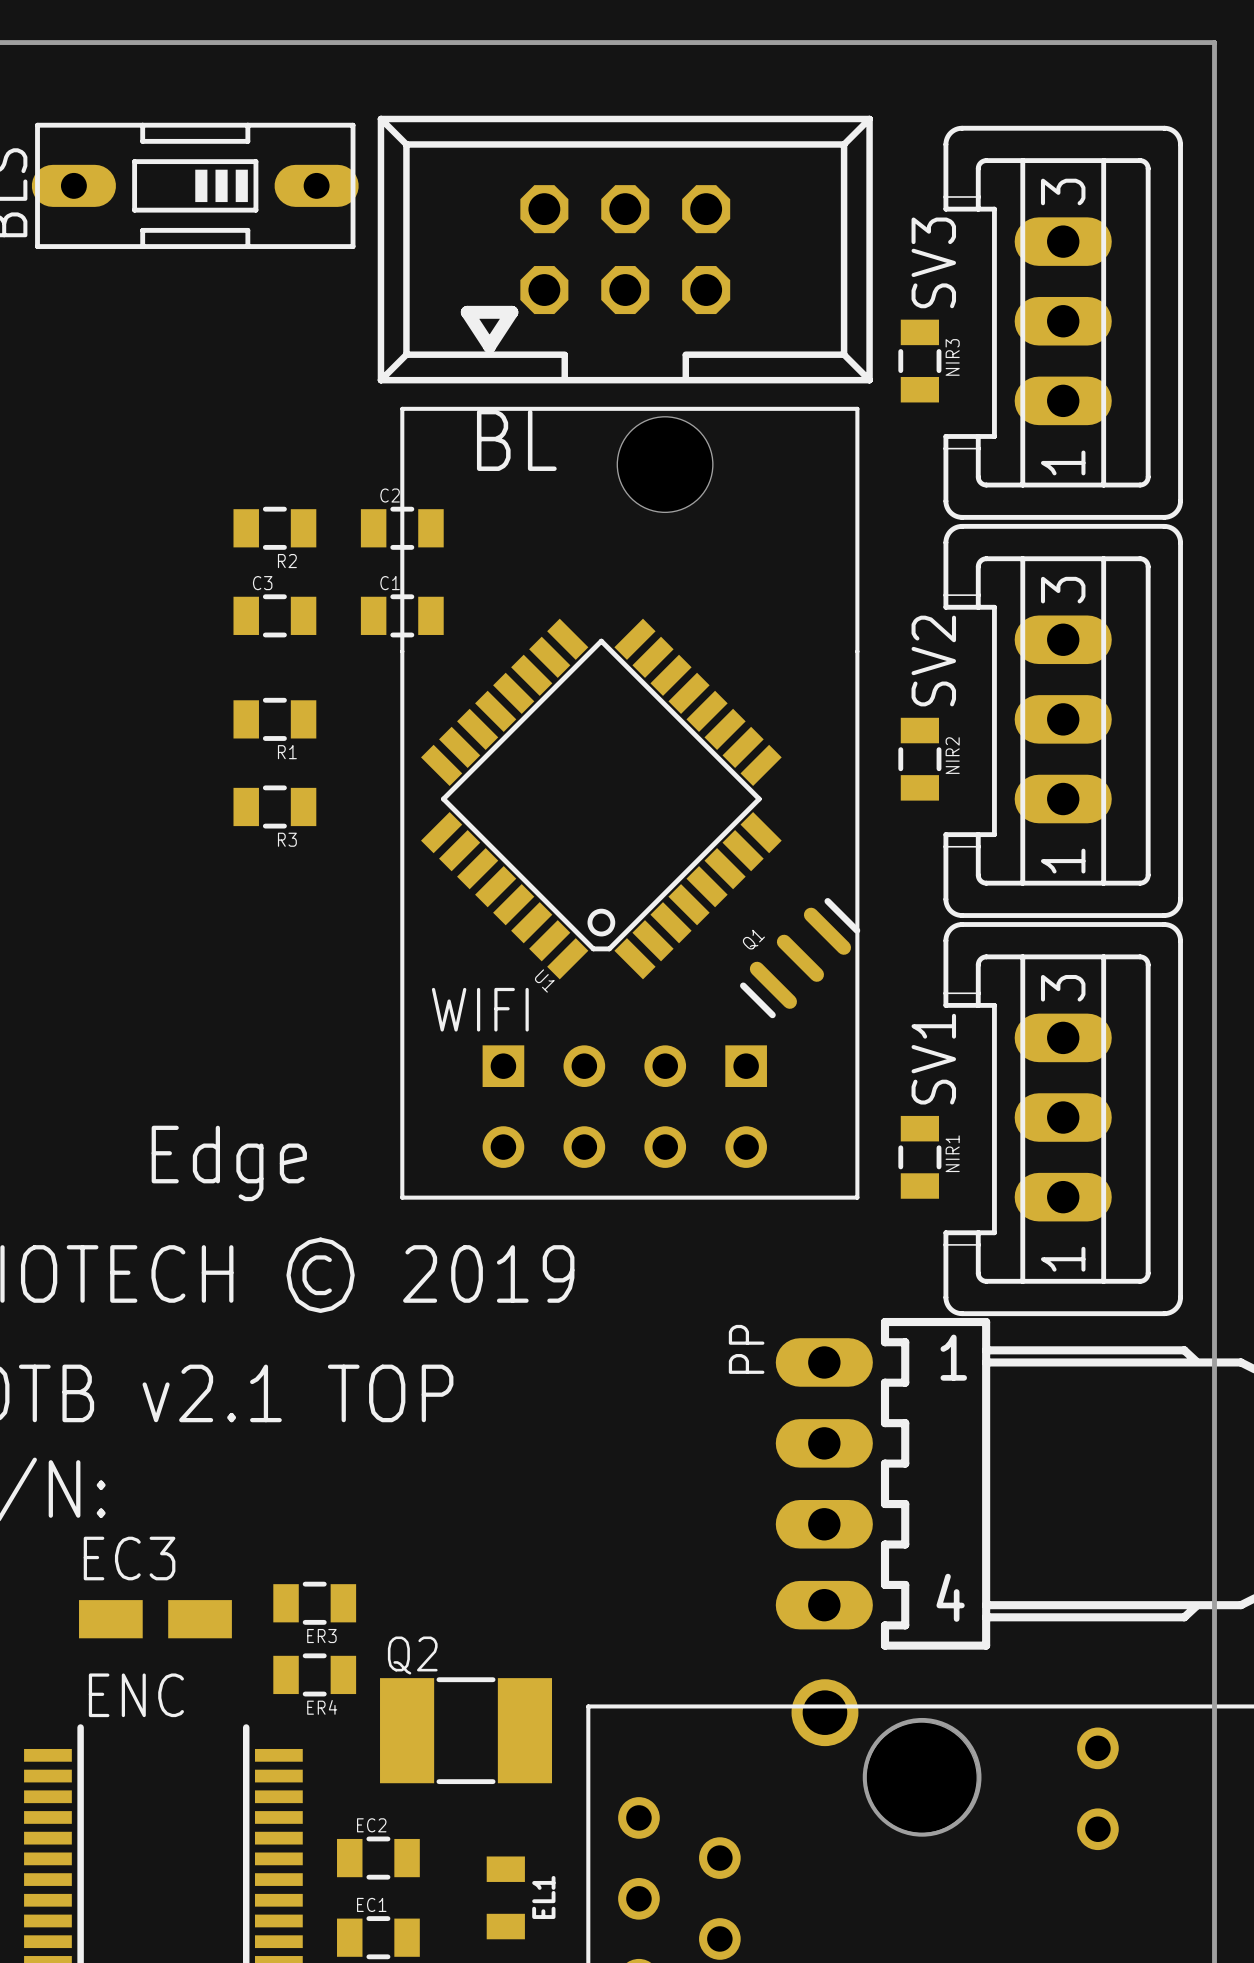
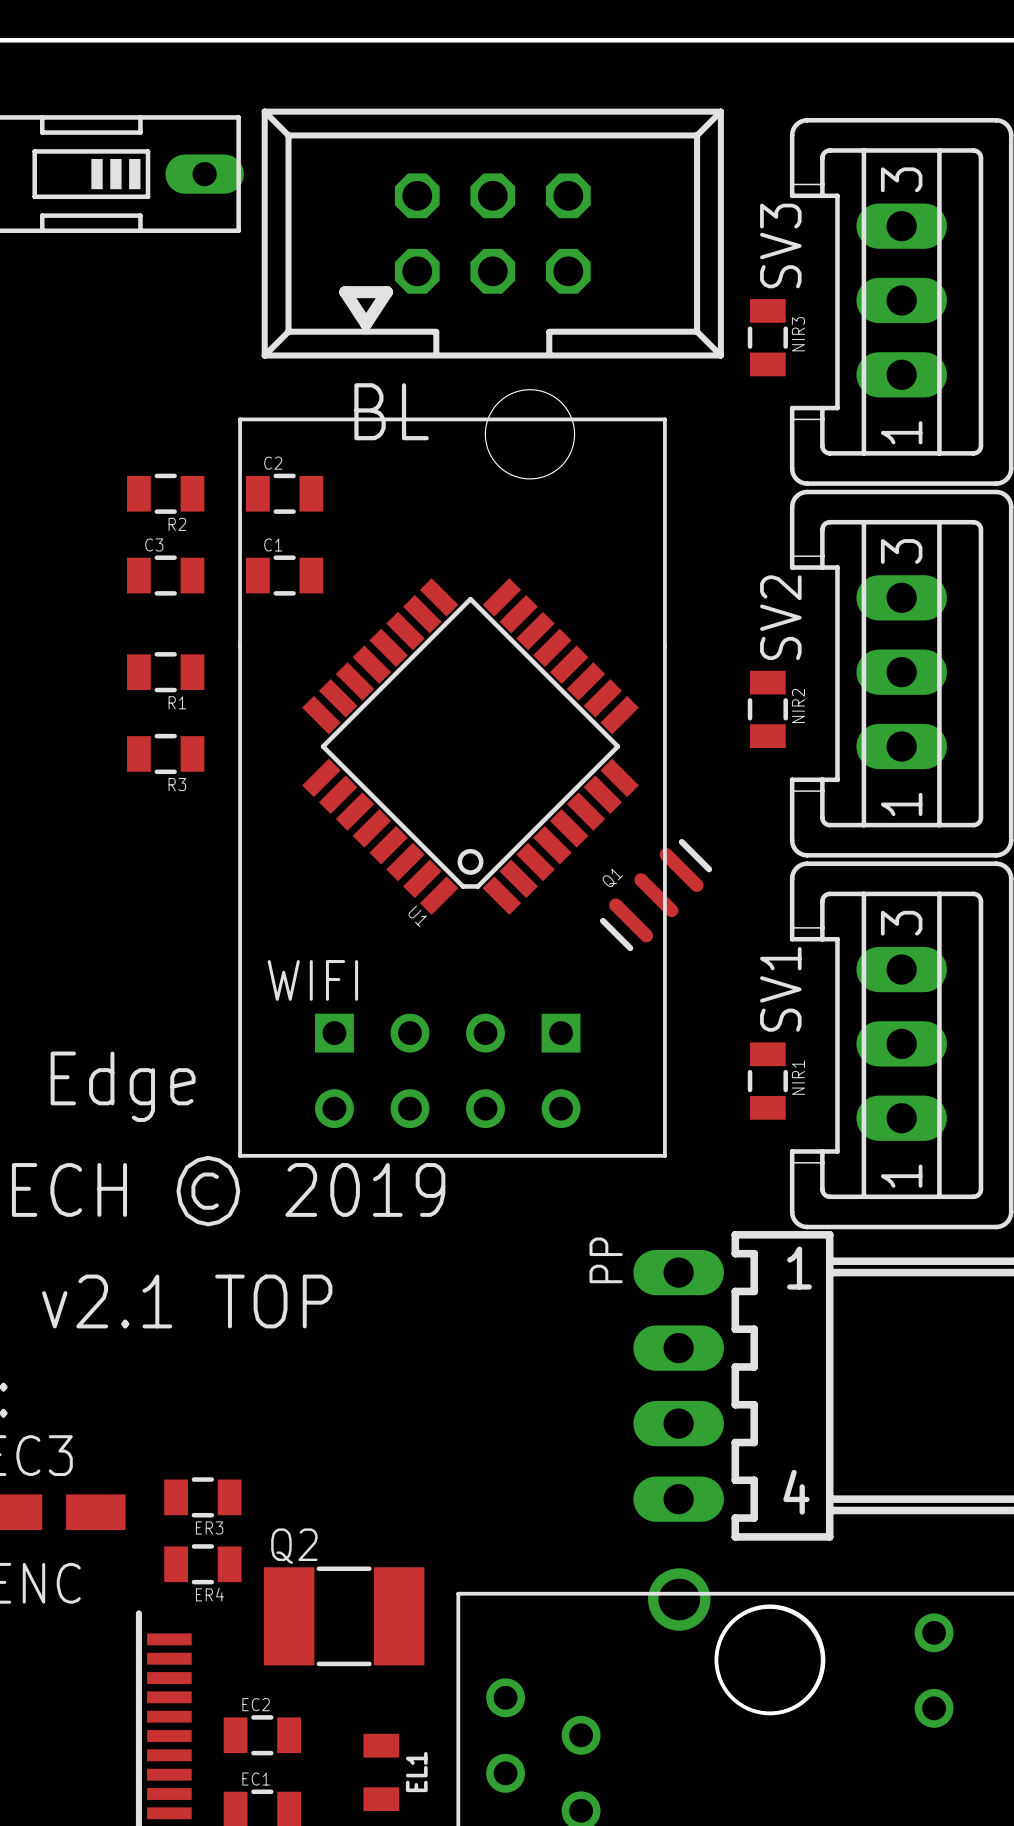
WIFI position: (629, 803) -> (452, 787)

